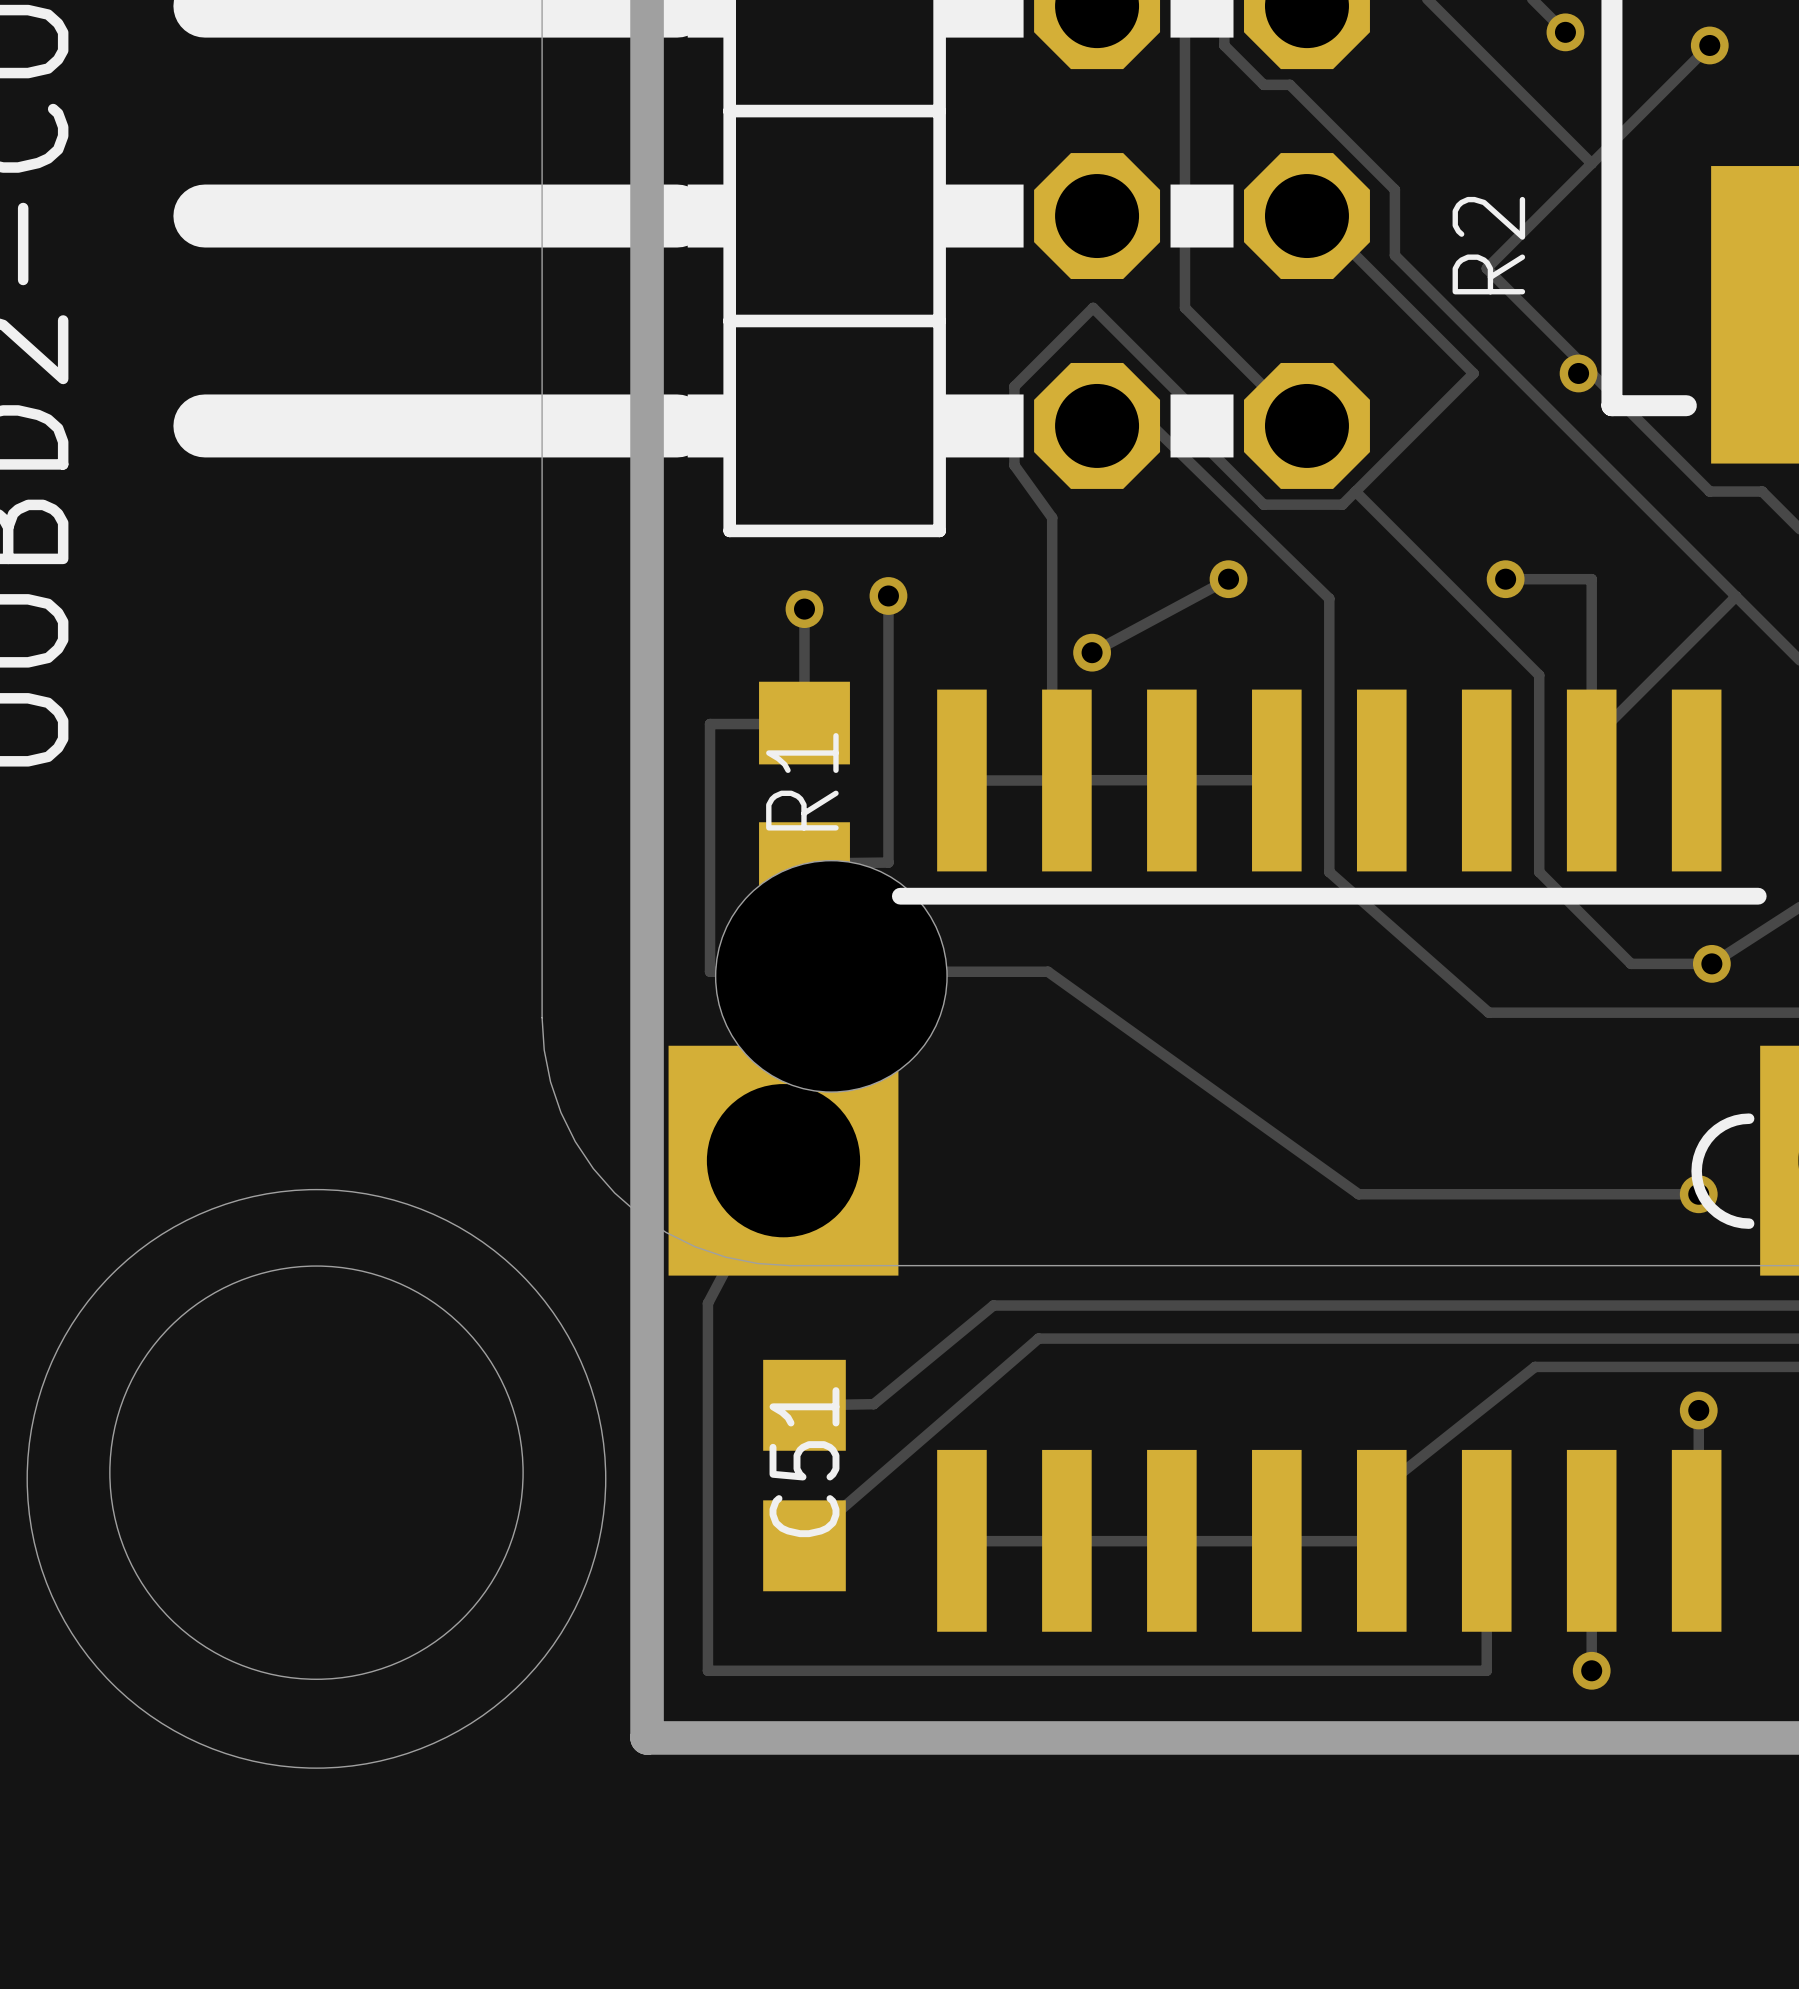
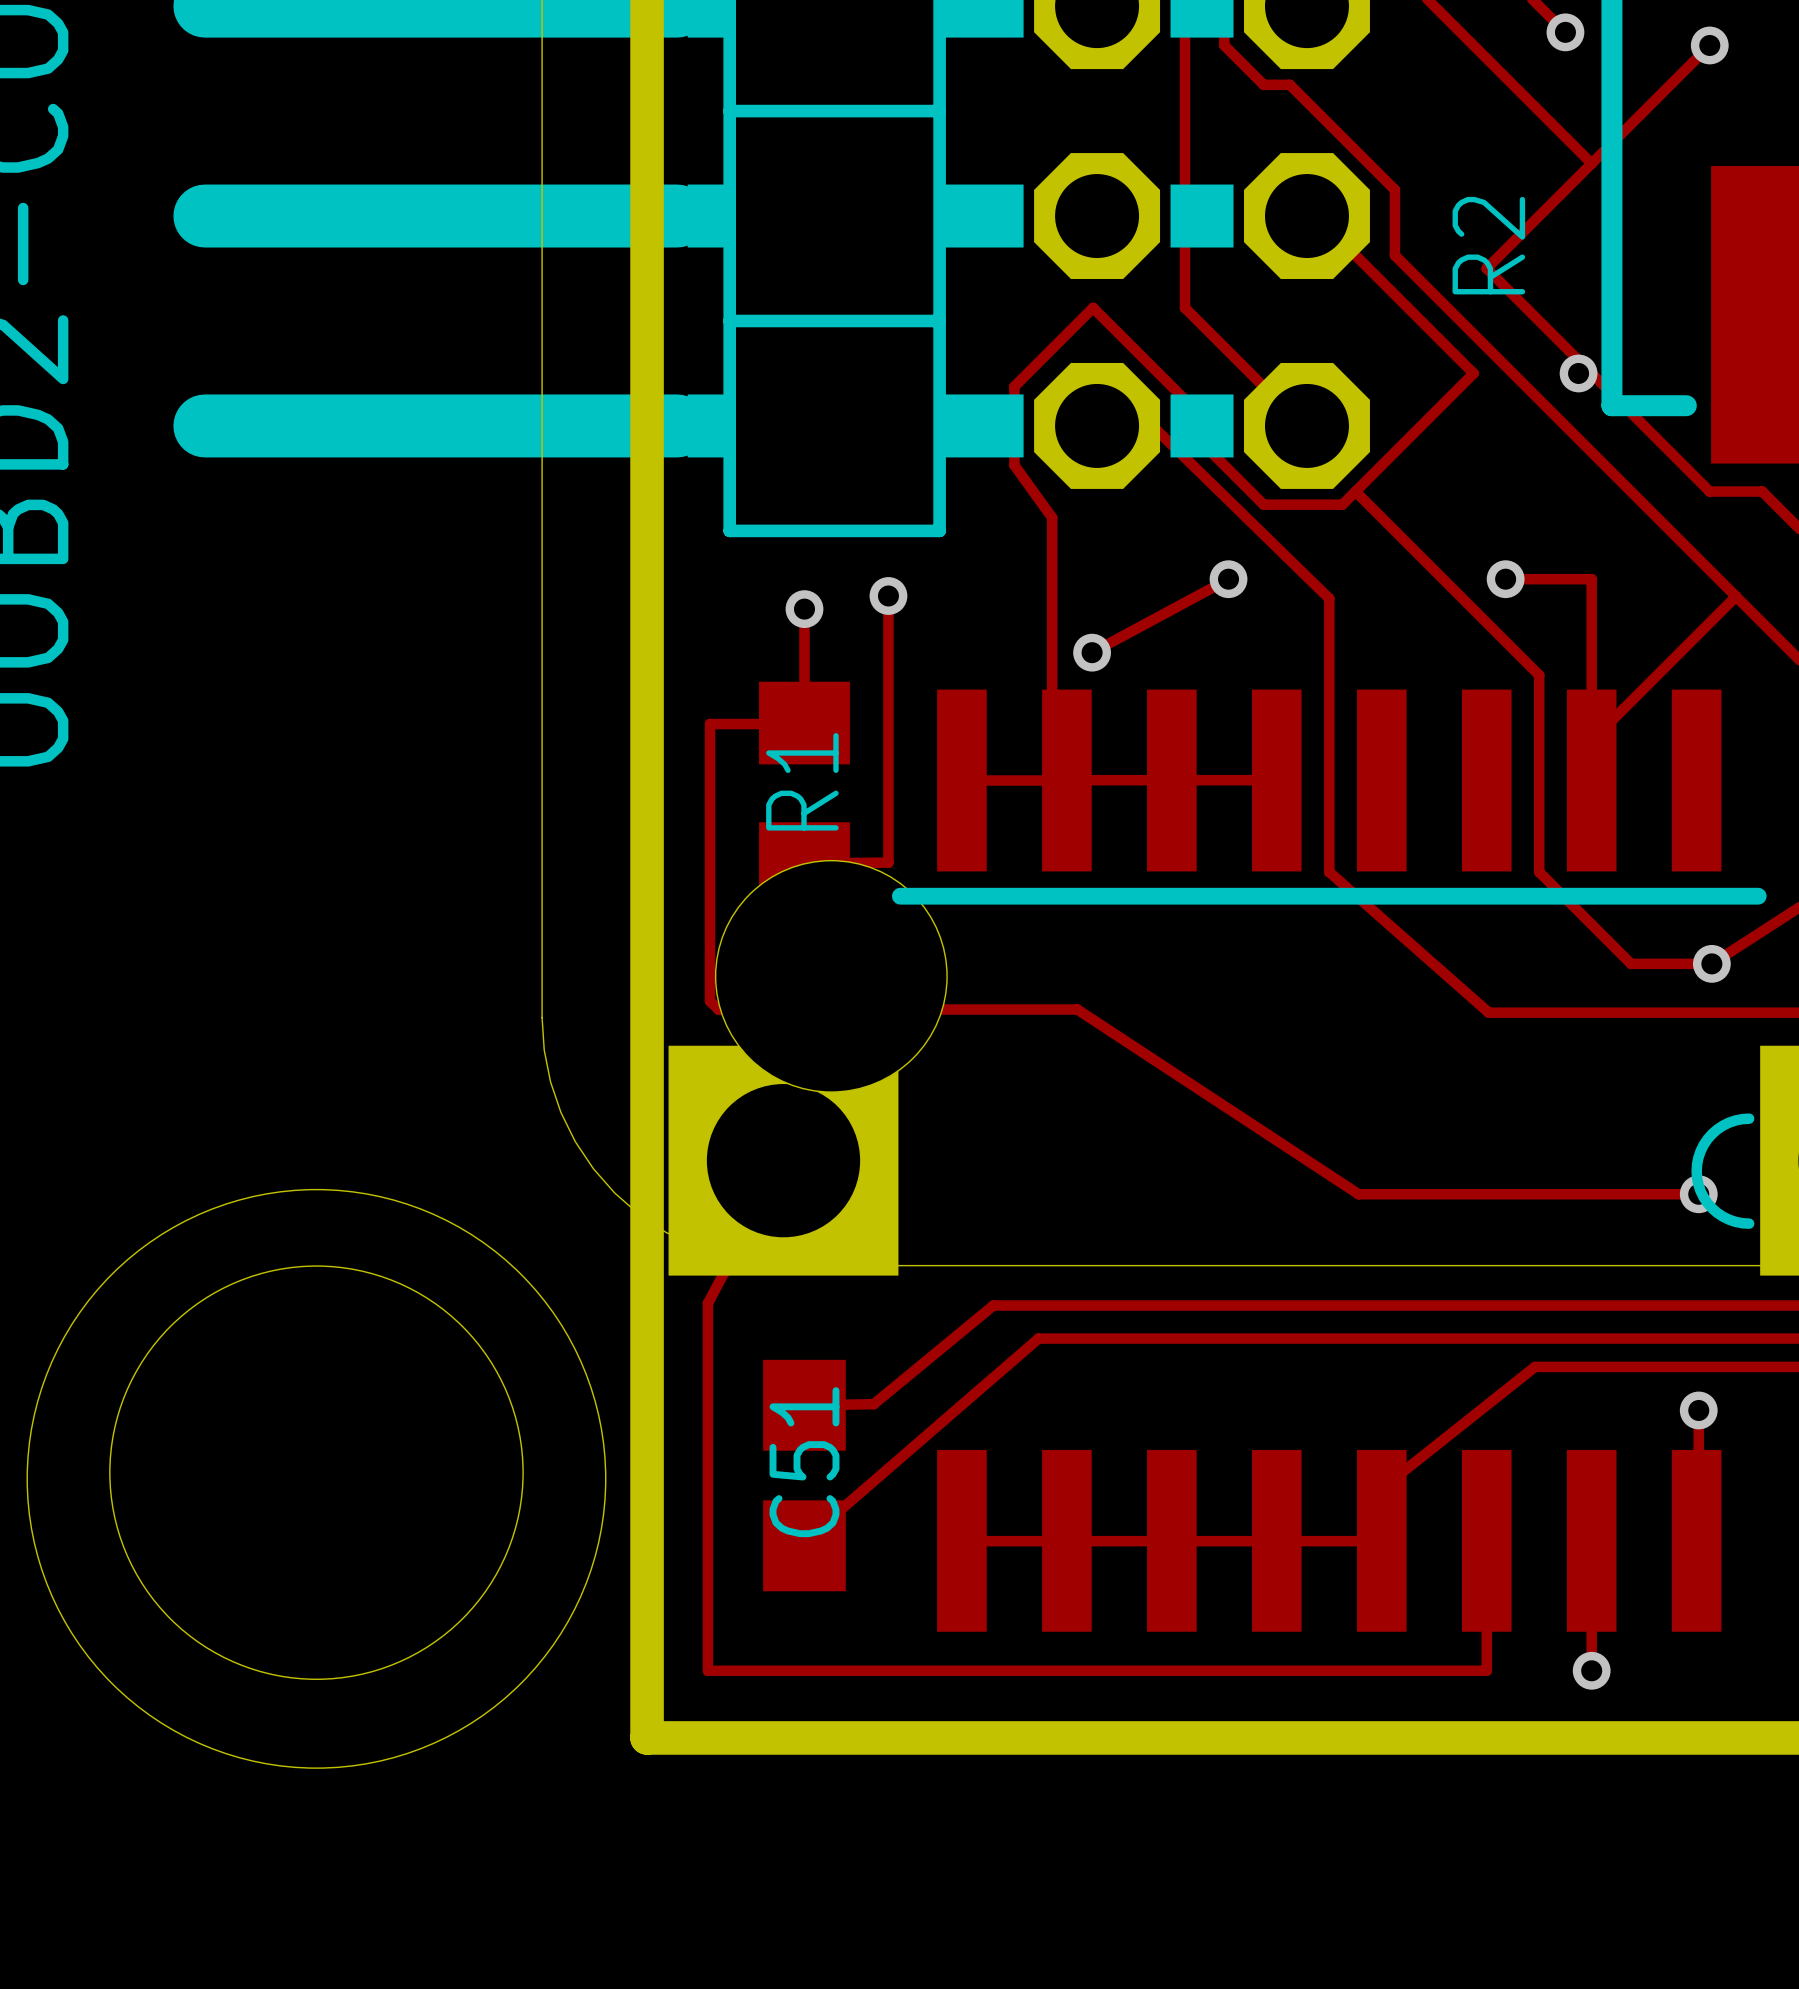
track: (710, 971) (1048, 971) (1358, 1194) -> (710, 971) (710, 1001) (718, 1009) (1077, 1009) (1358, 1194)

